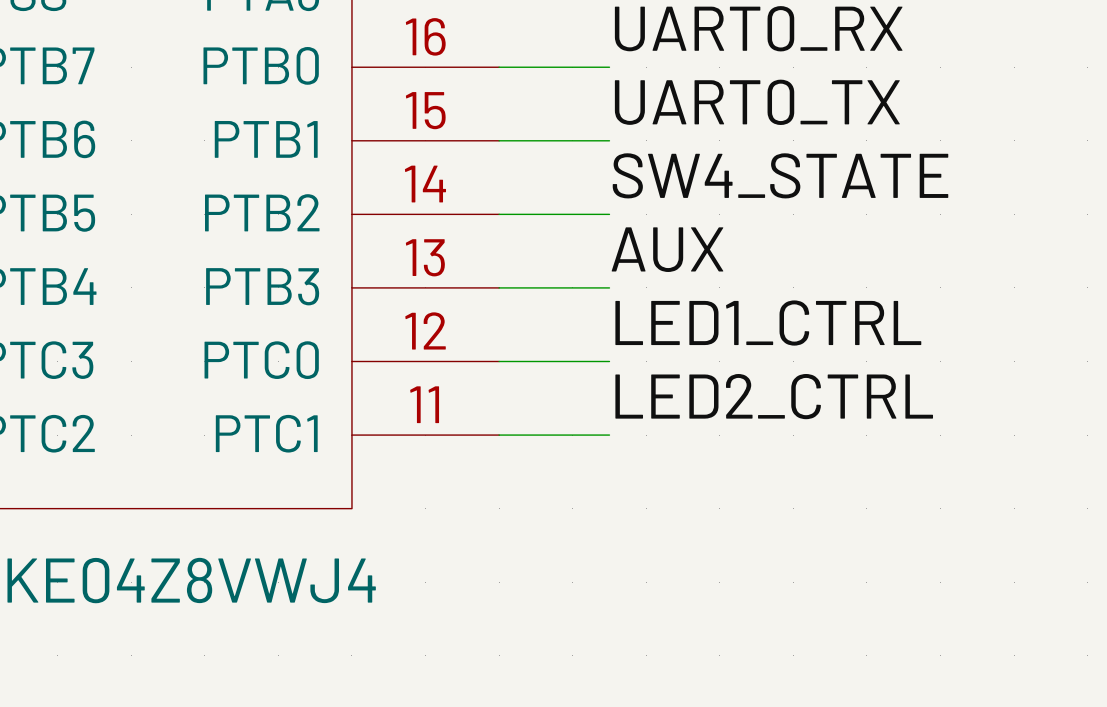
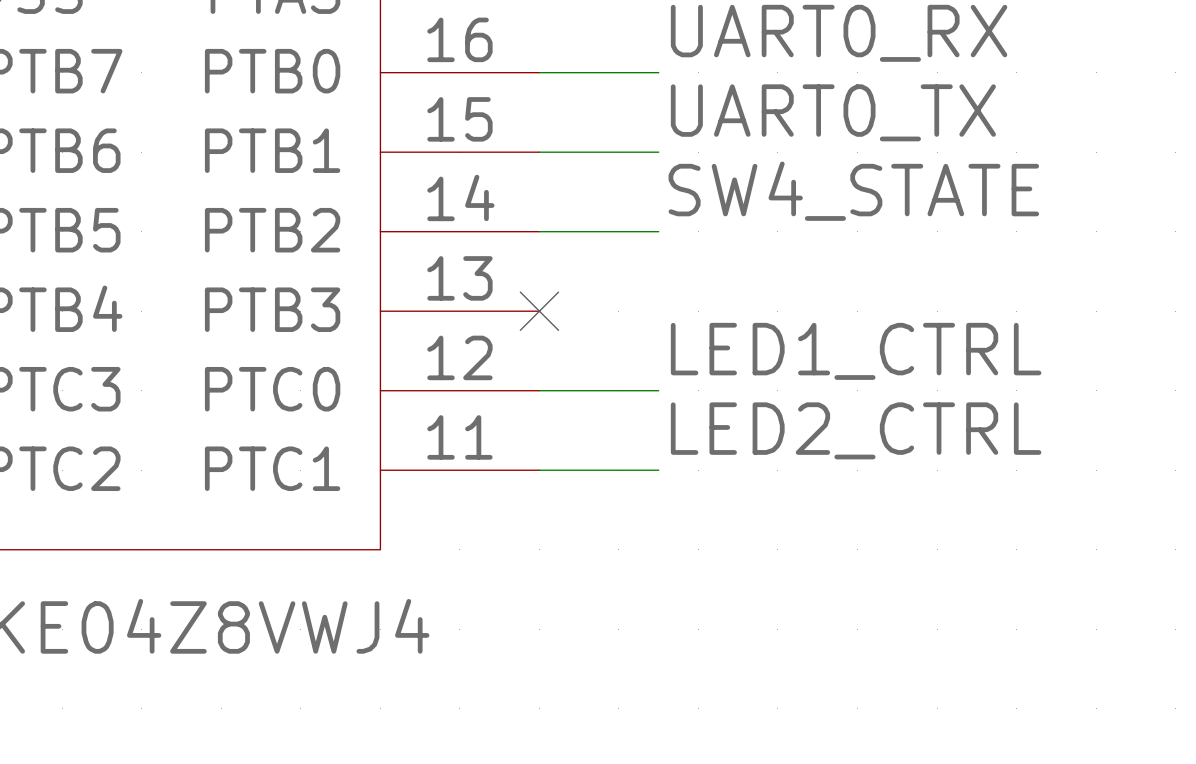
label: AUX (667, 249) -> none
wire: (499, 287) (609, 287) -> none
no-connect mark: none -> (539, 311)

